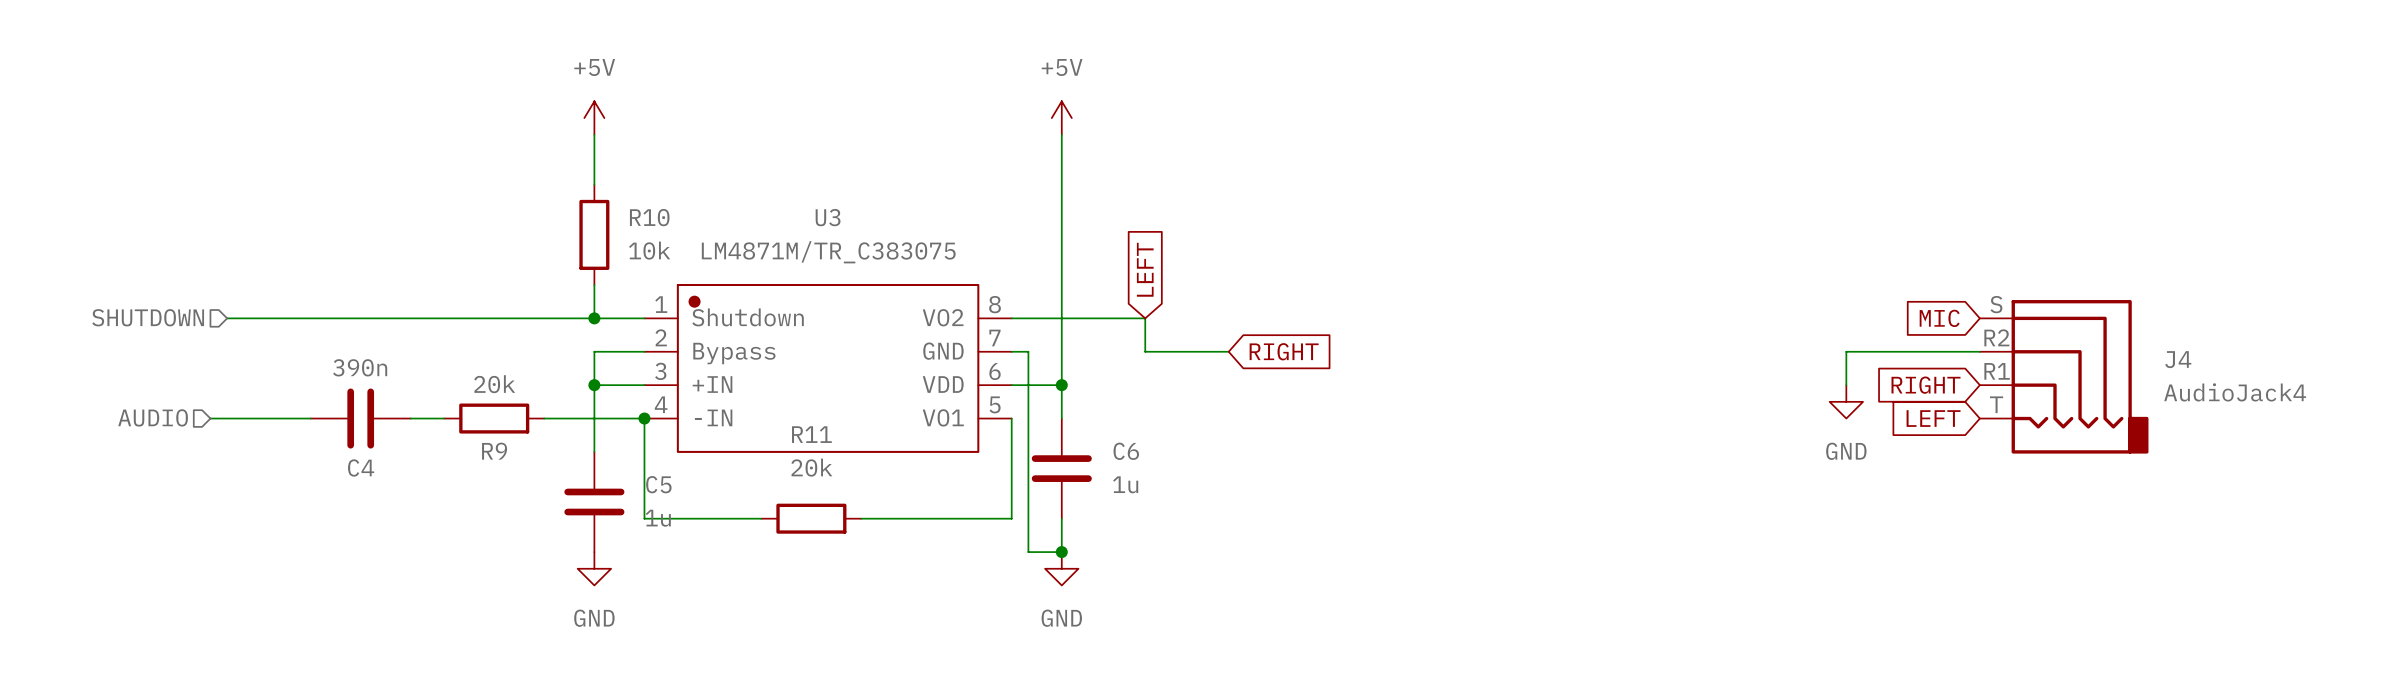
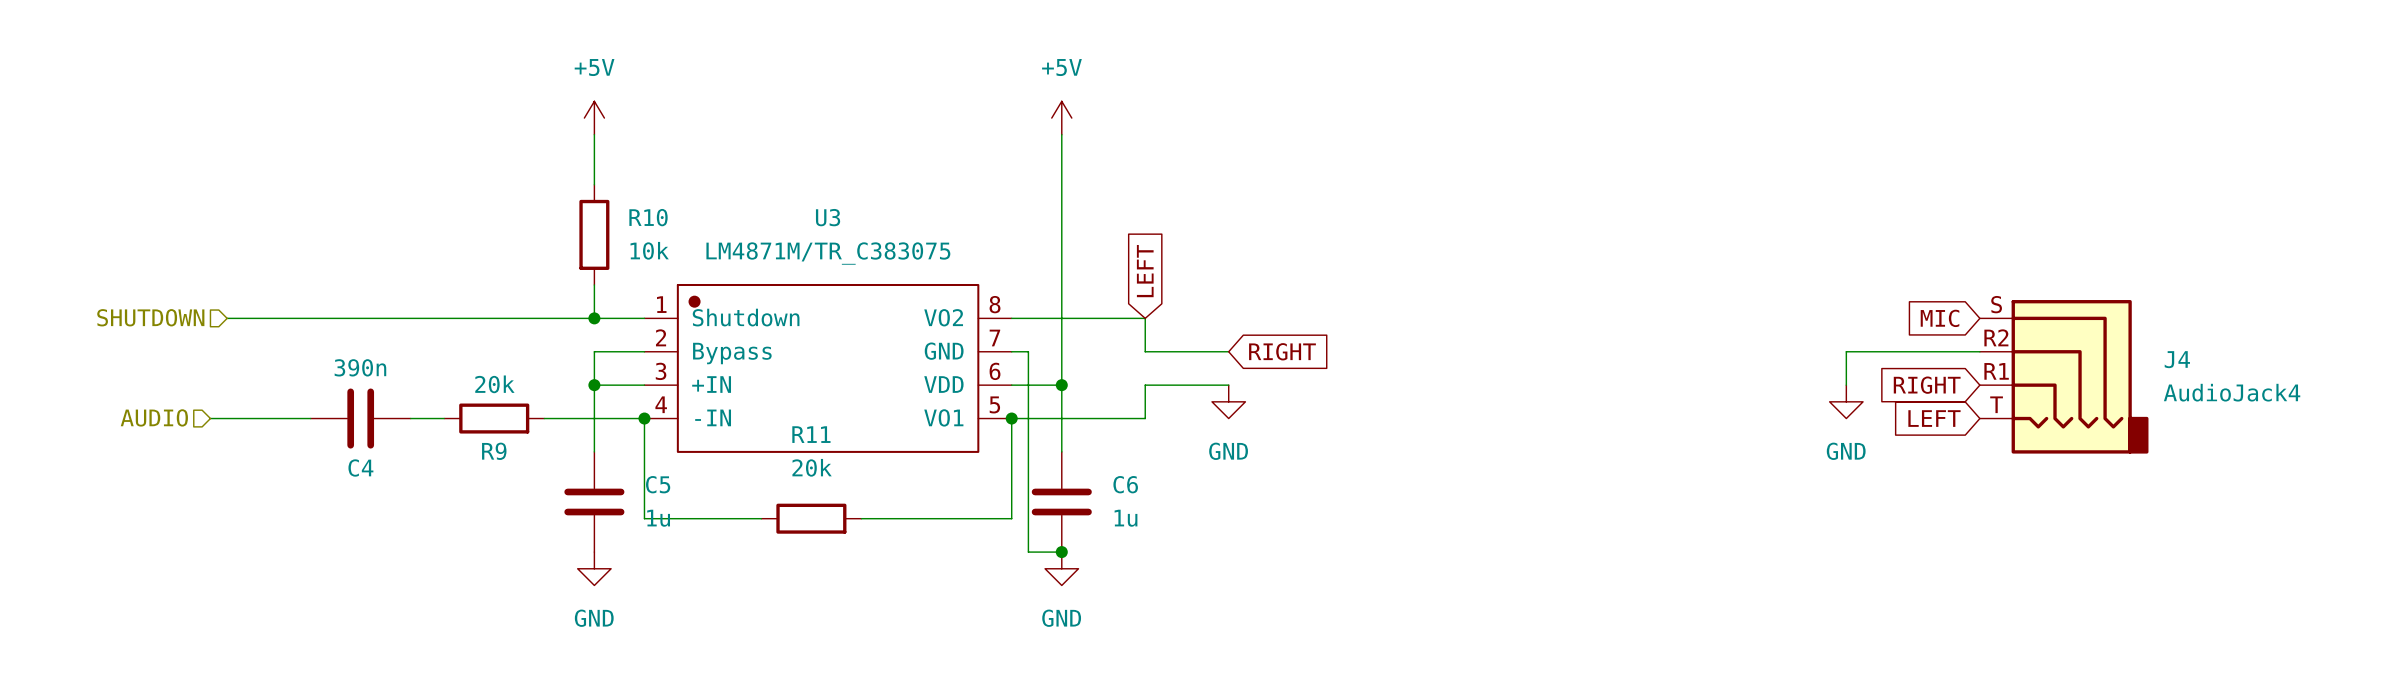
wire: none -> (1228, 385) (1145, 385) (1145, 418) (1011, 418)
power symbol: none -> GND (1228, 401)
junction: none -> (1011, 418)
C6 position: (1061, 468) -> (1061, 502)

